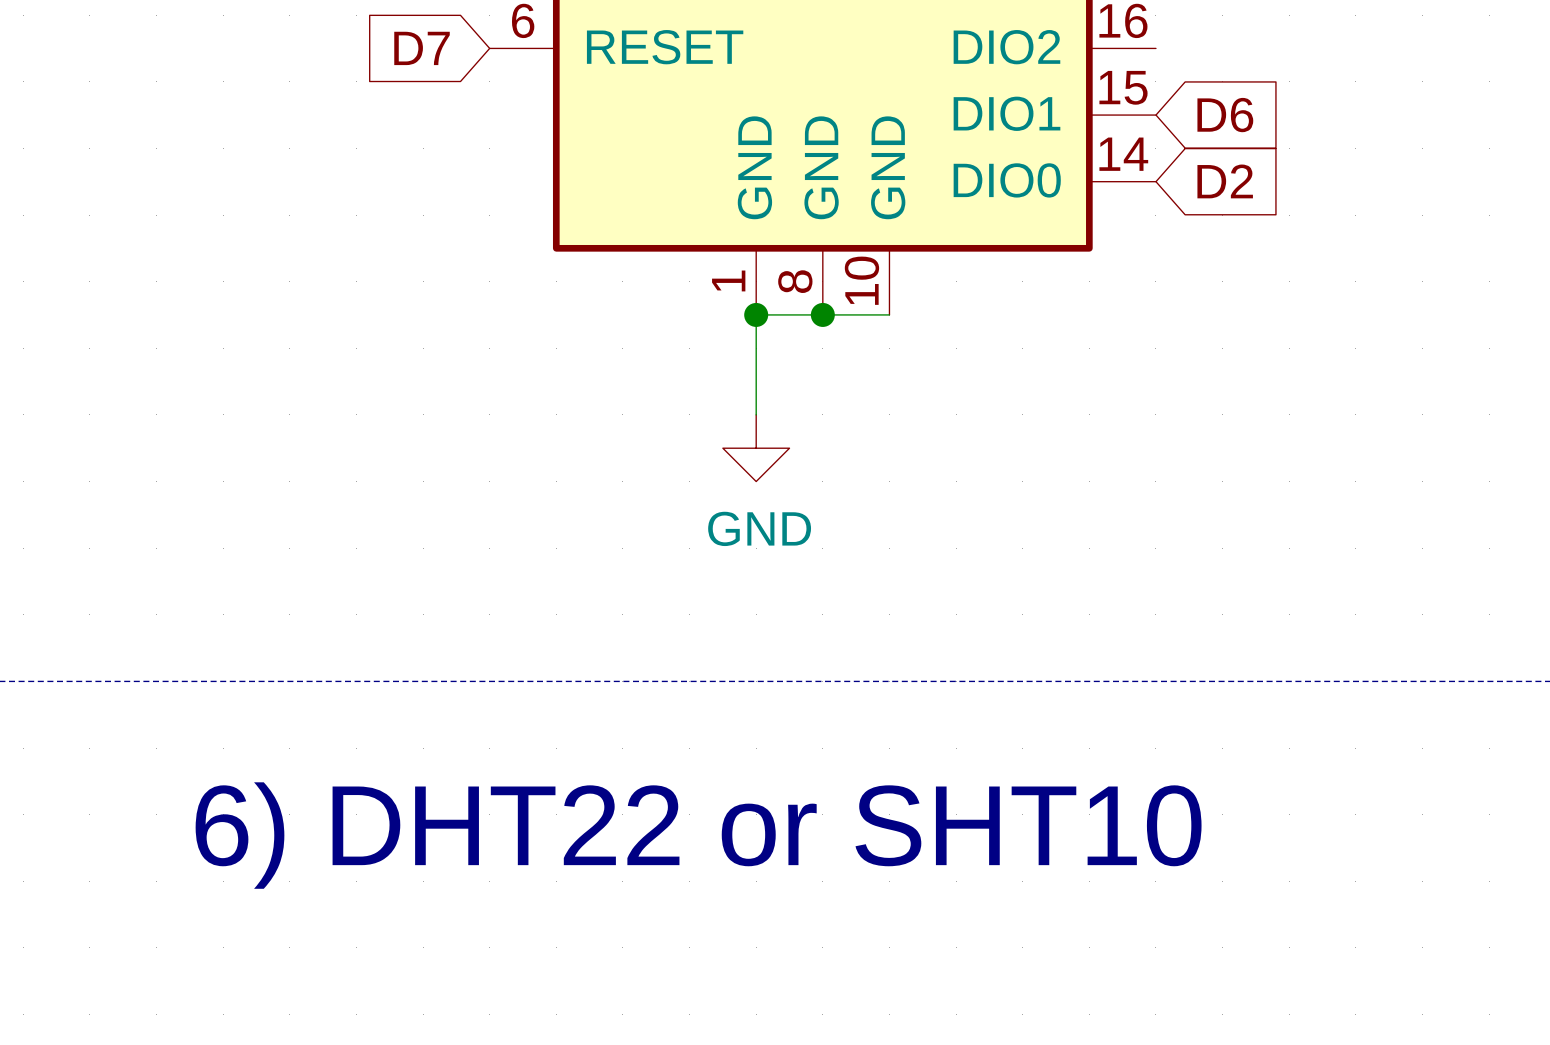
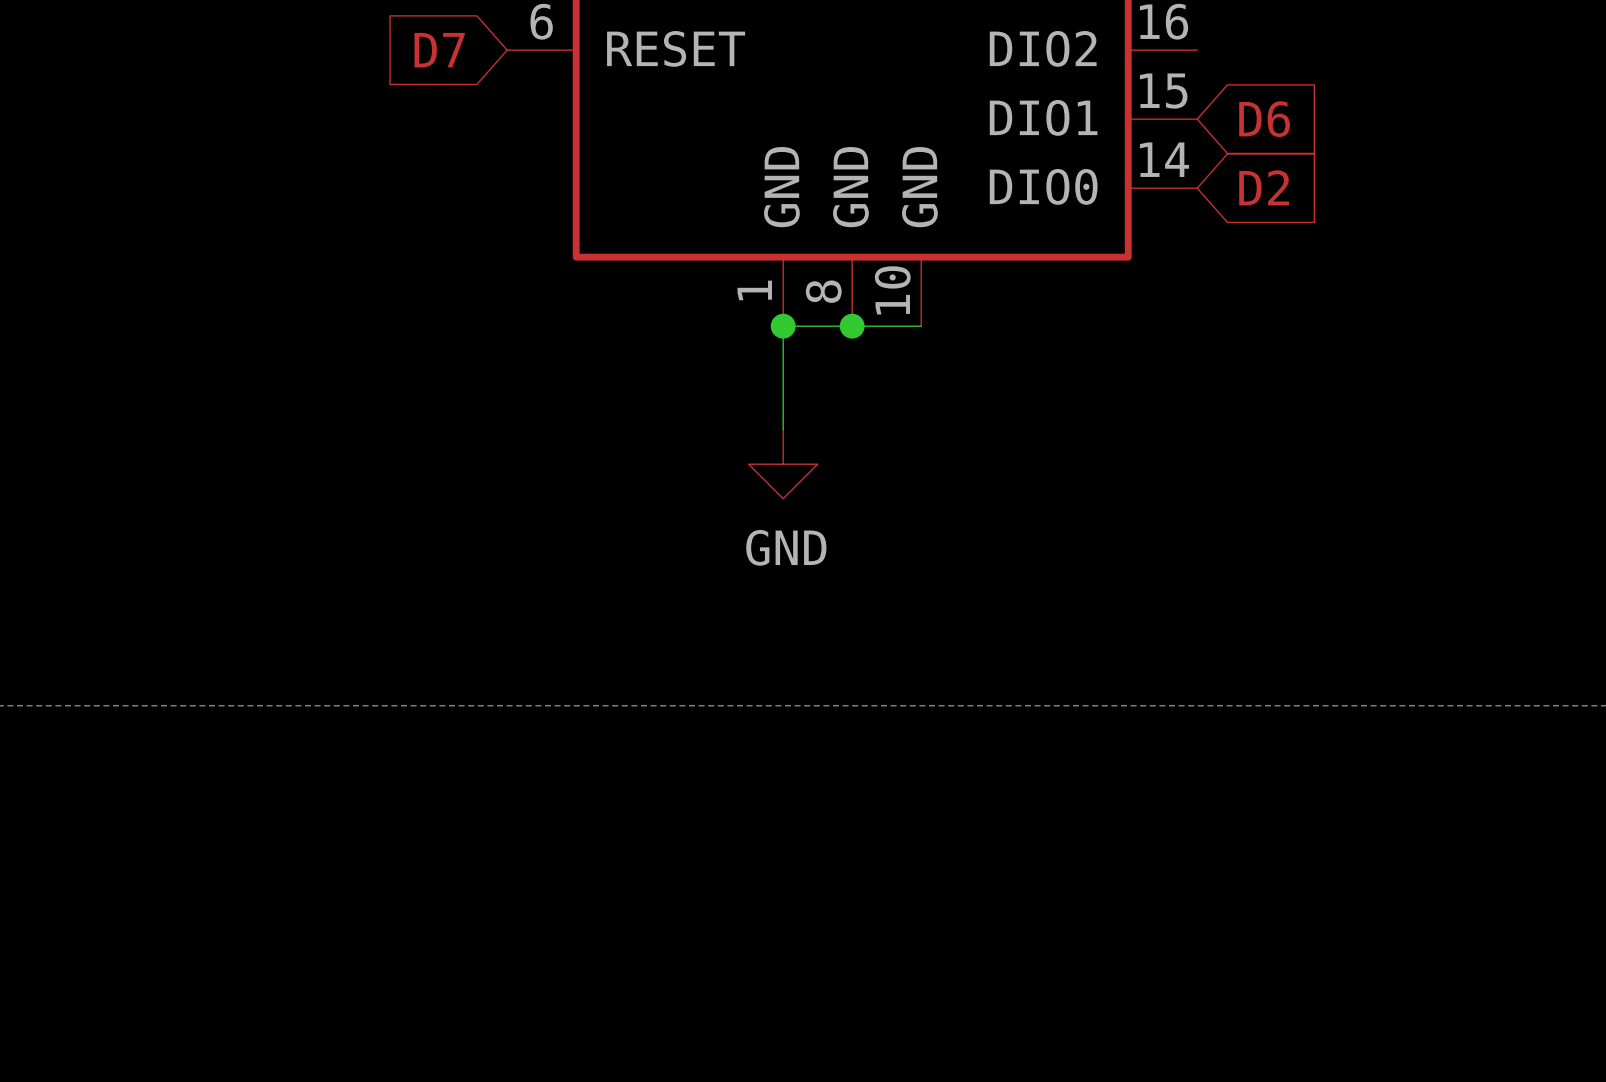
text: 6) DHT22 or SHT10 (698, 835) -> none

